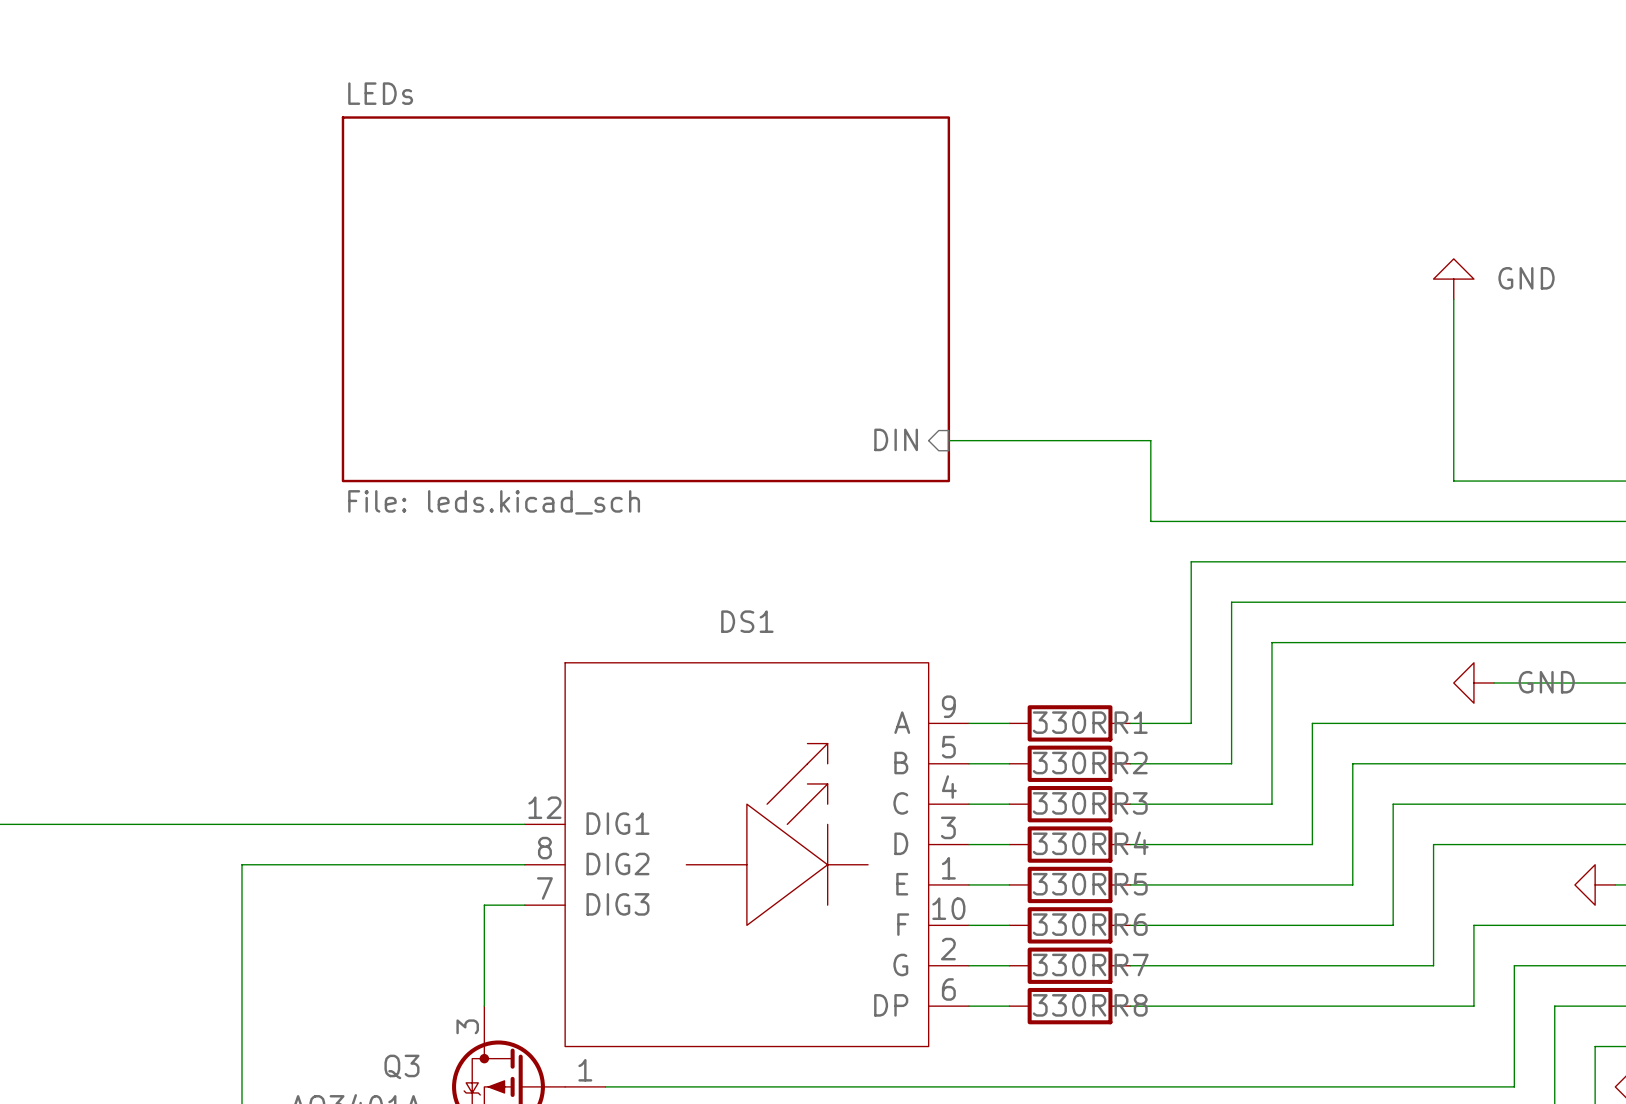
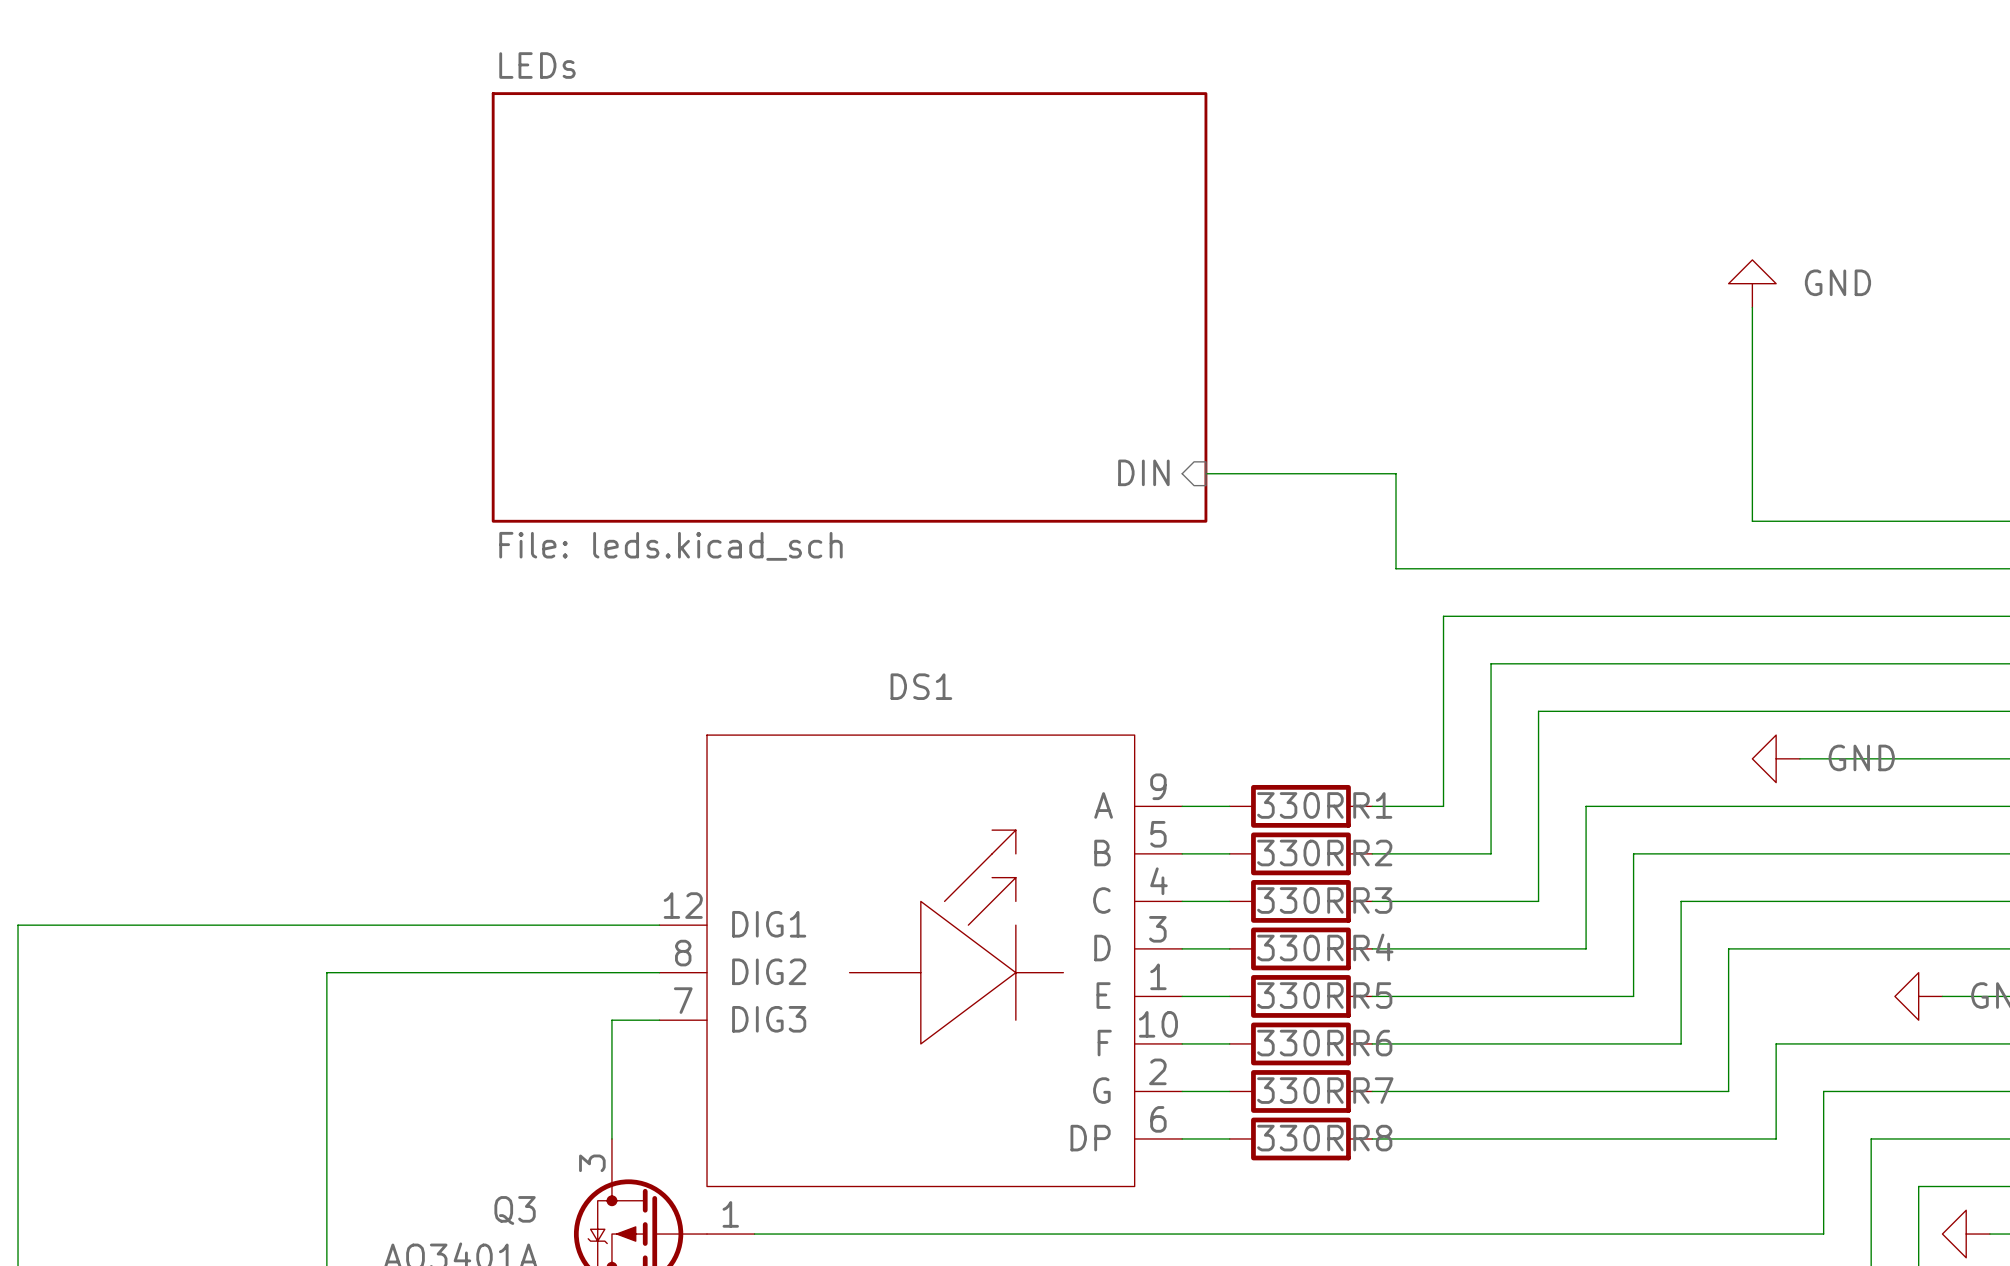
sheet LEDs position: (645, 299) -> (849, 307)
sheet pin position: DIN (896, 439) -> DIN (1143, 472)
wire: (948, 440) (989, 440) -> none

